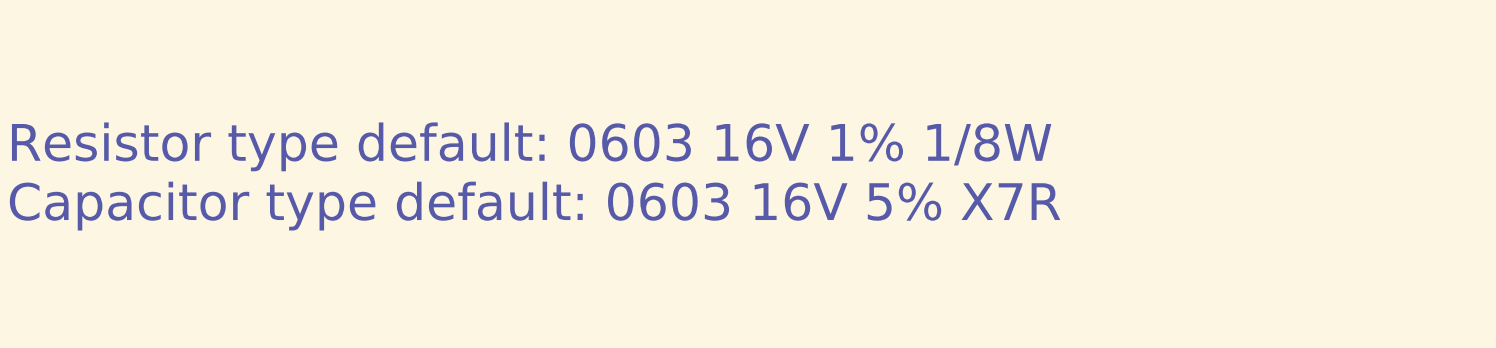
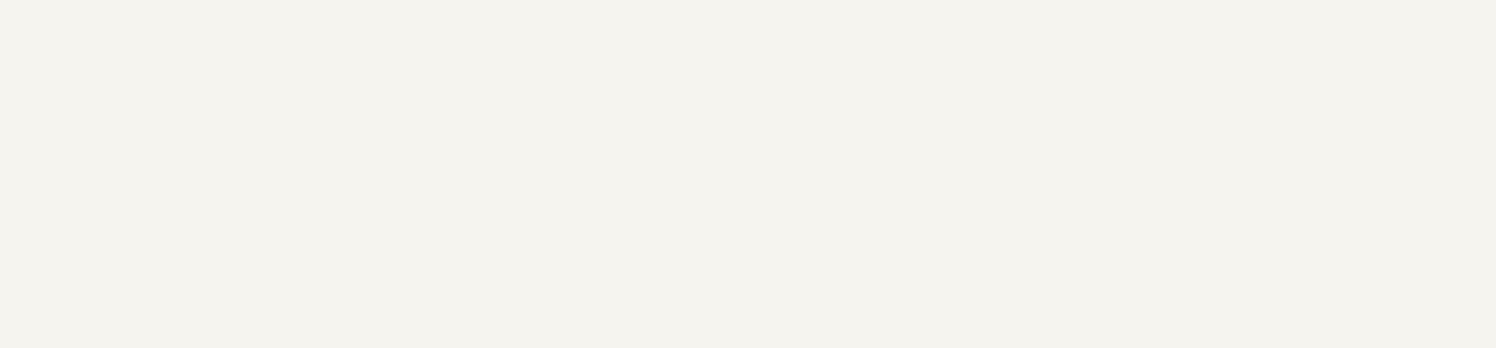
text: Resistor type default: 0603 16V 1% 1/8W (531, 146) -> none
text: Capacitor type default: 0603 16V 5% X7R (535, 206) -> none

